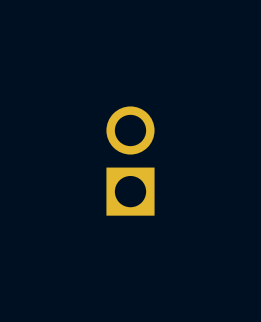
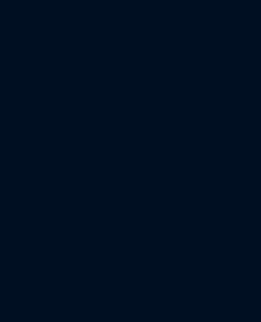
part: (130, 161) -> none

